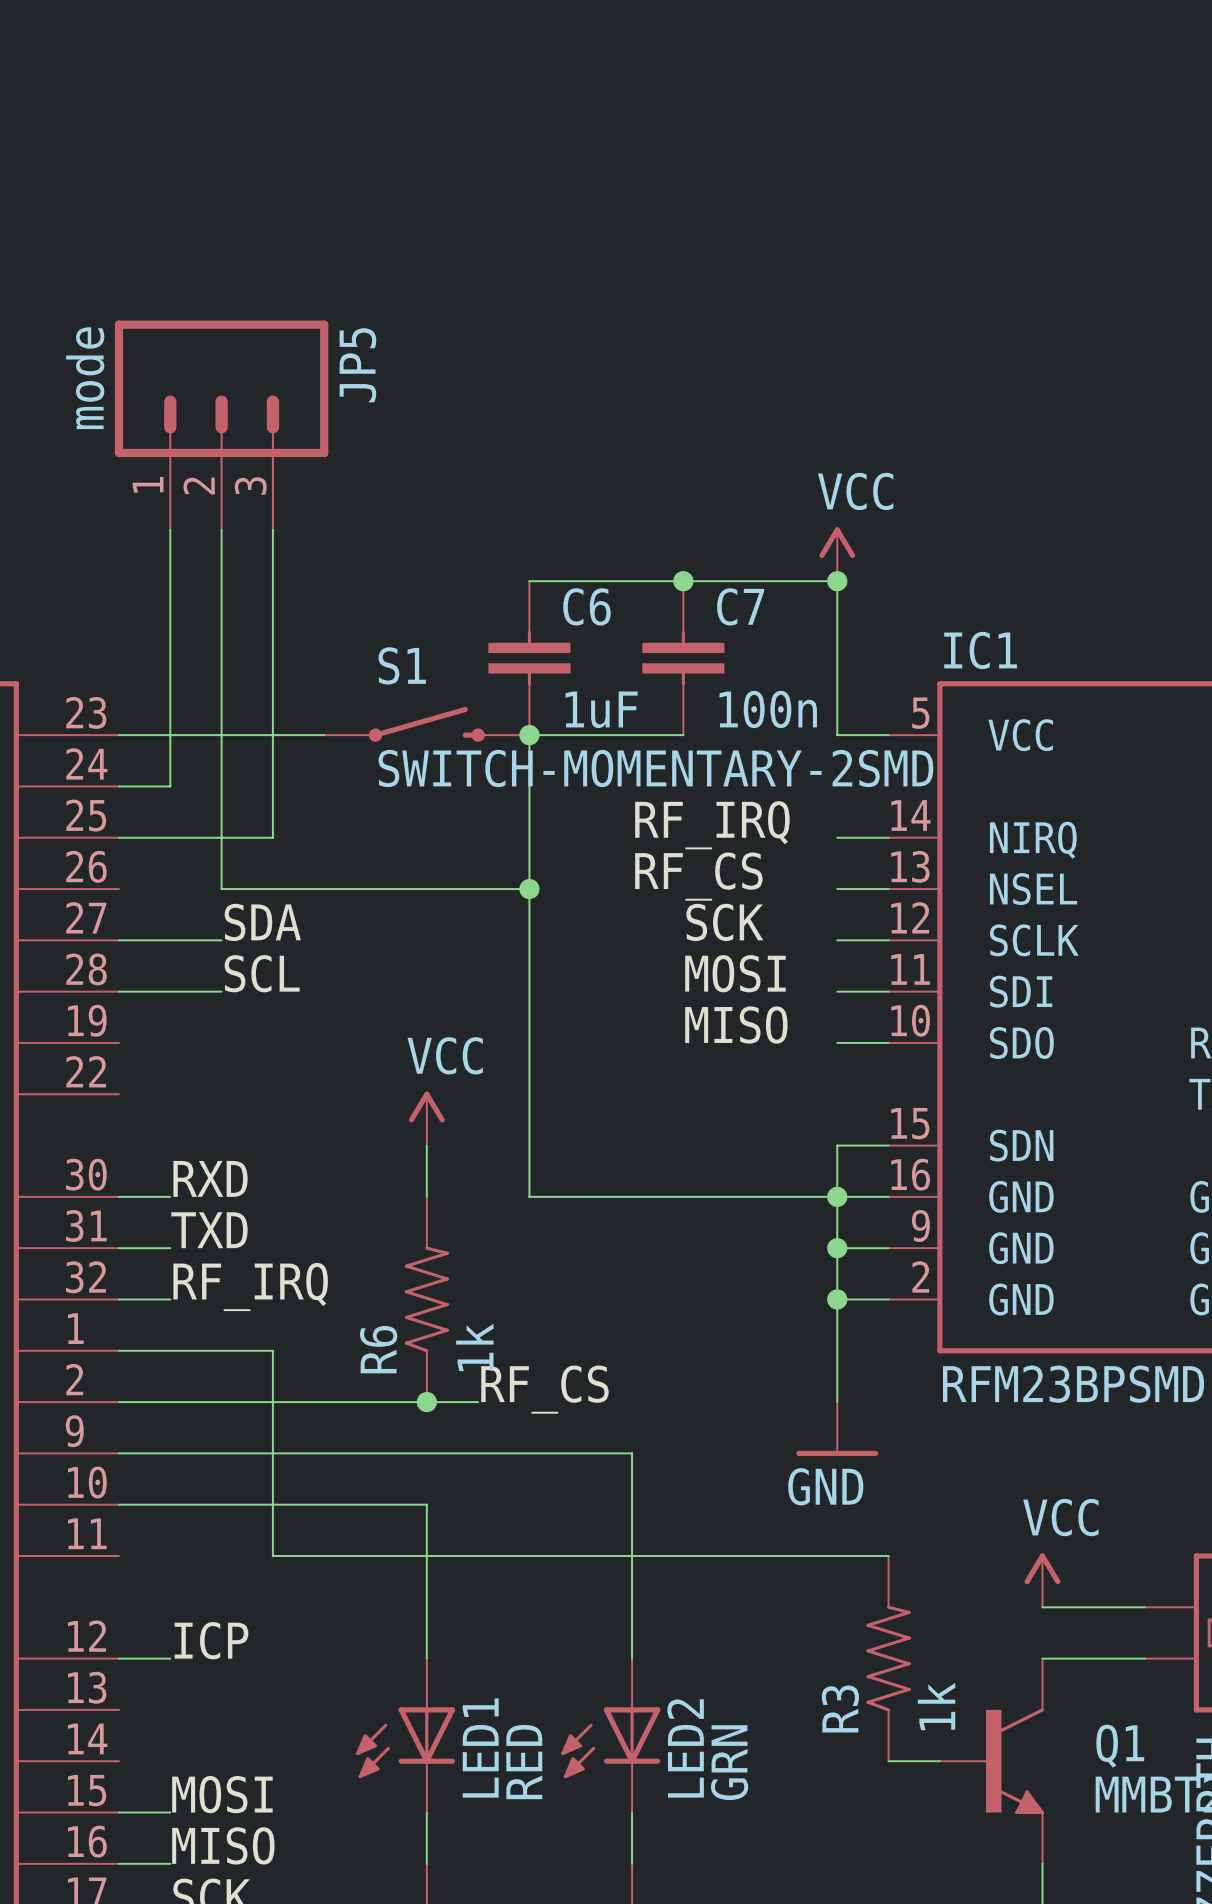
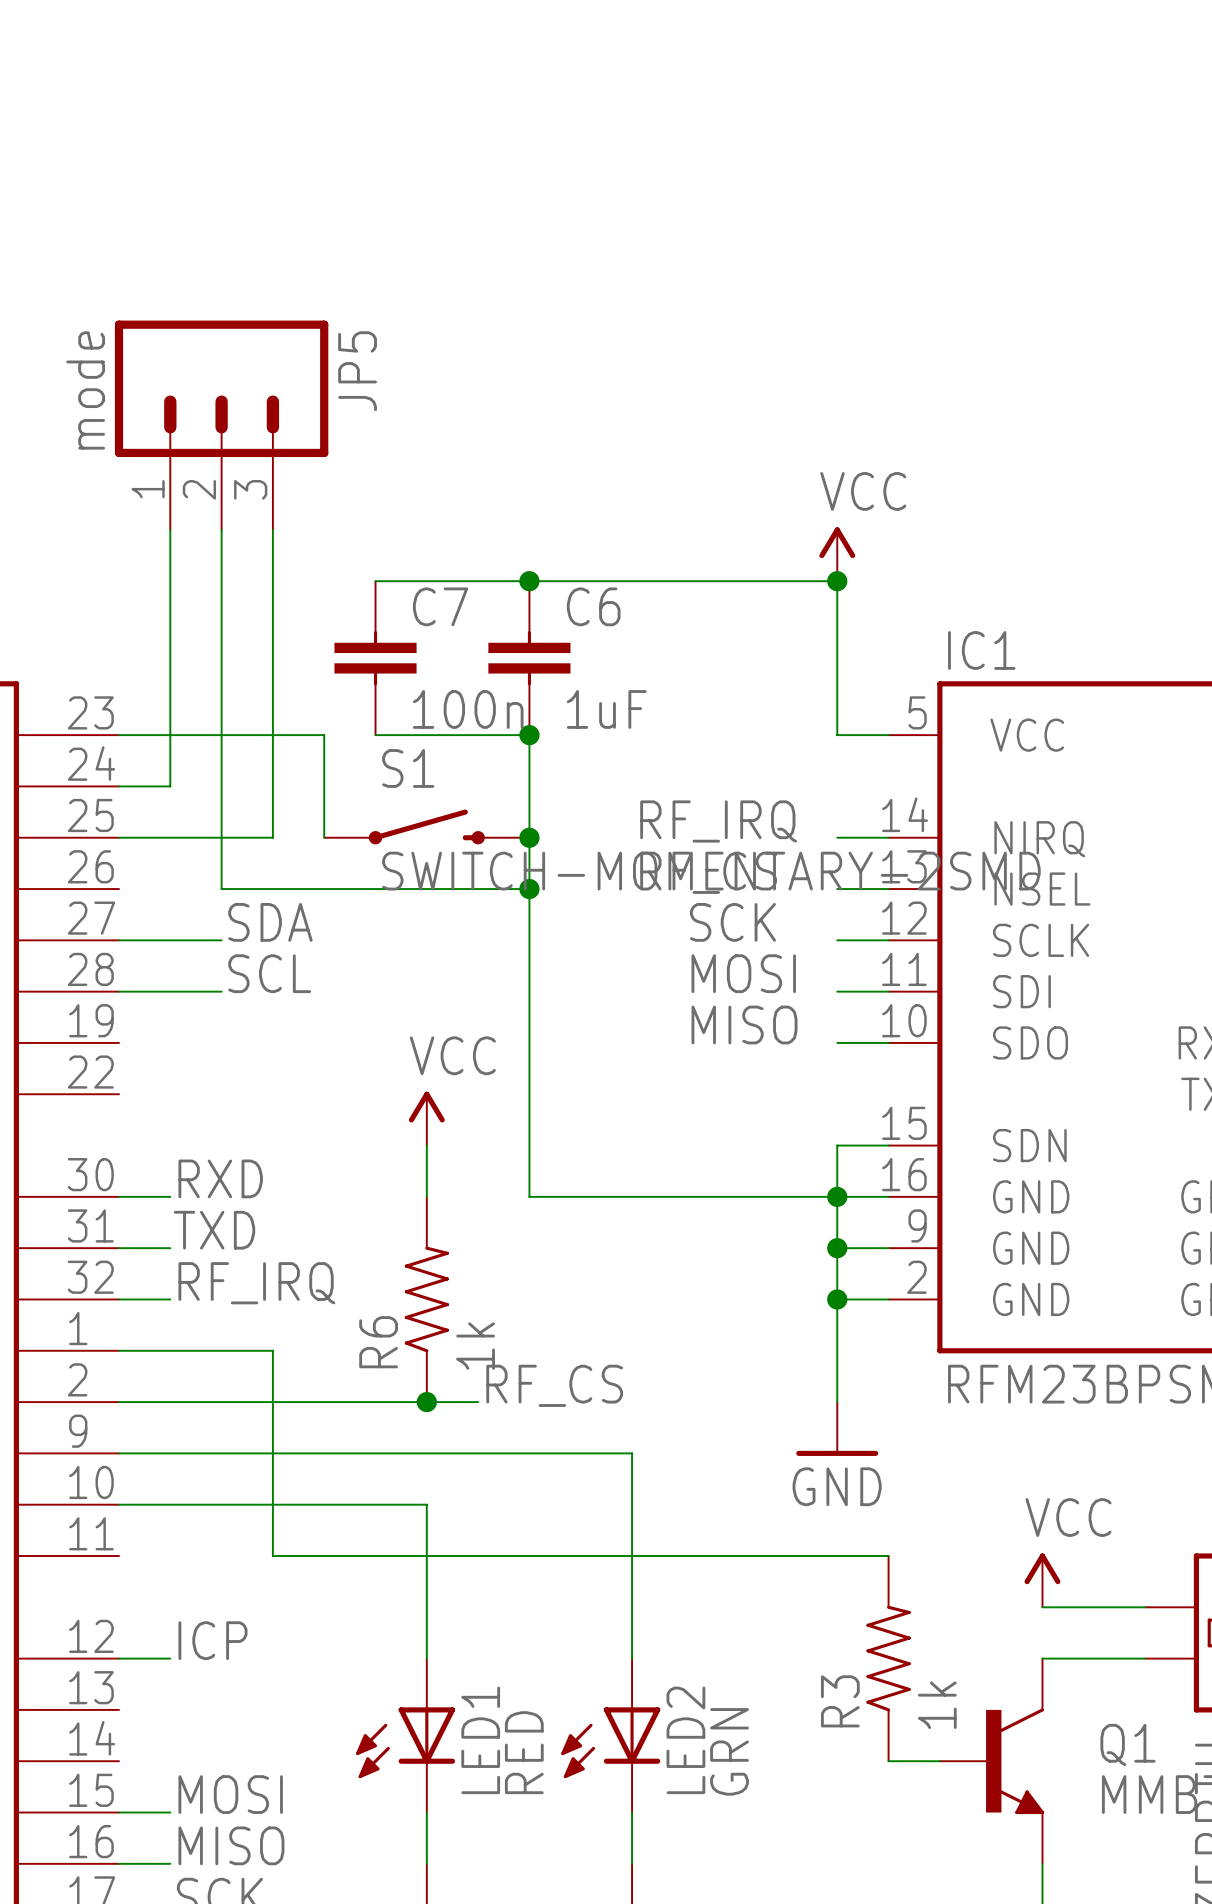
wire: none -> (375, 581) (529, 581)
junction: none -> (529, 581)
junction: (683, 581) -> none
C7 position: (683, 658) -> (375, 658)
S1 position: (426, 724) -> (426, 826)
wire: none -> (324, 735) (324, 837)
wire: (529, 735) (683, 735) -> (529, 735) (375, 735)
junction: none -> (529, 837)

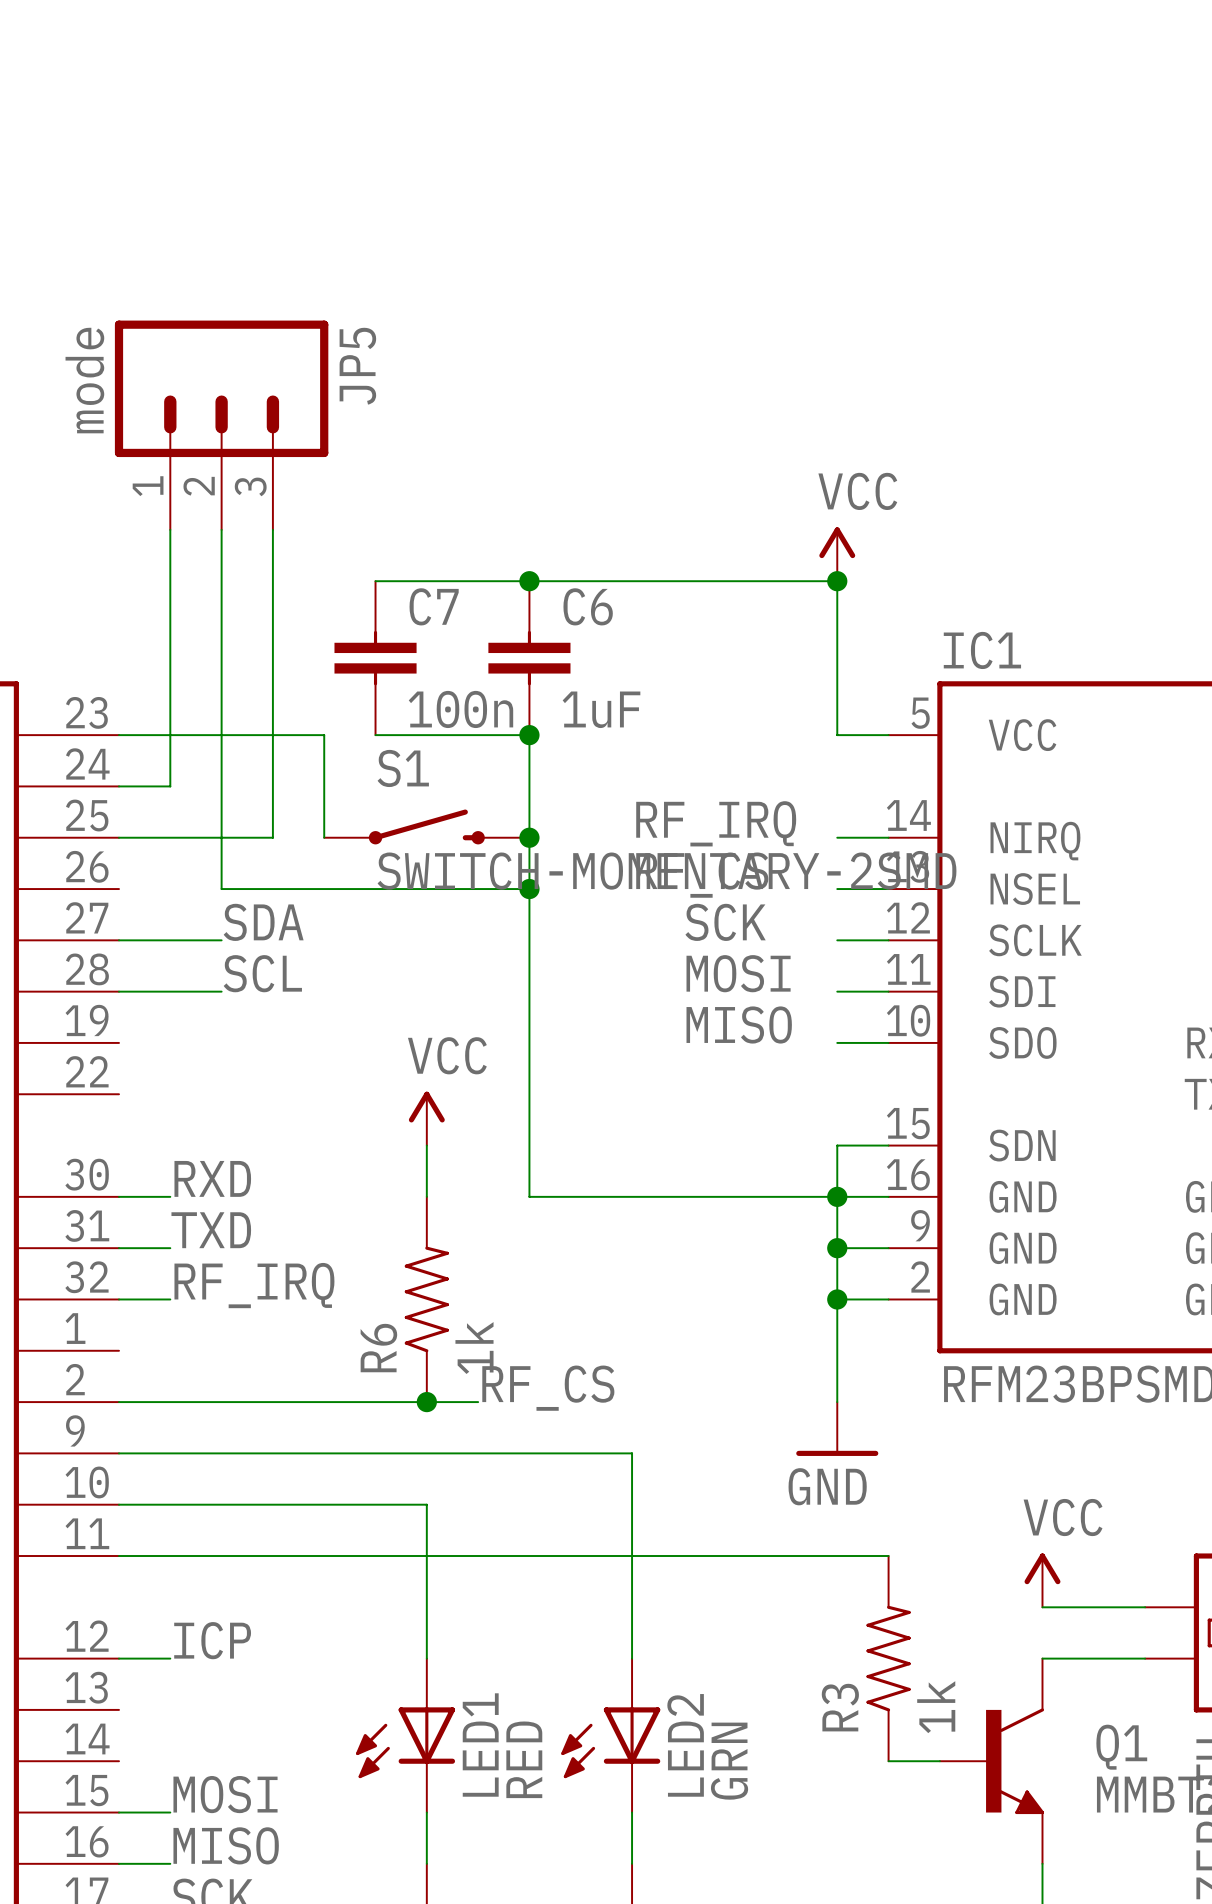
wire: (119, 1350) (272, 1350) (272, 1556) -> (119, 1556) (272, 1556)

